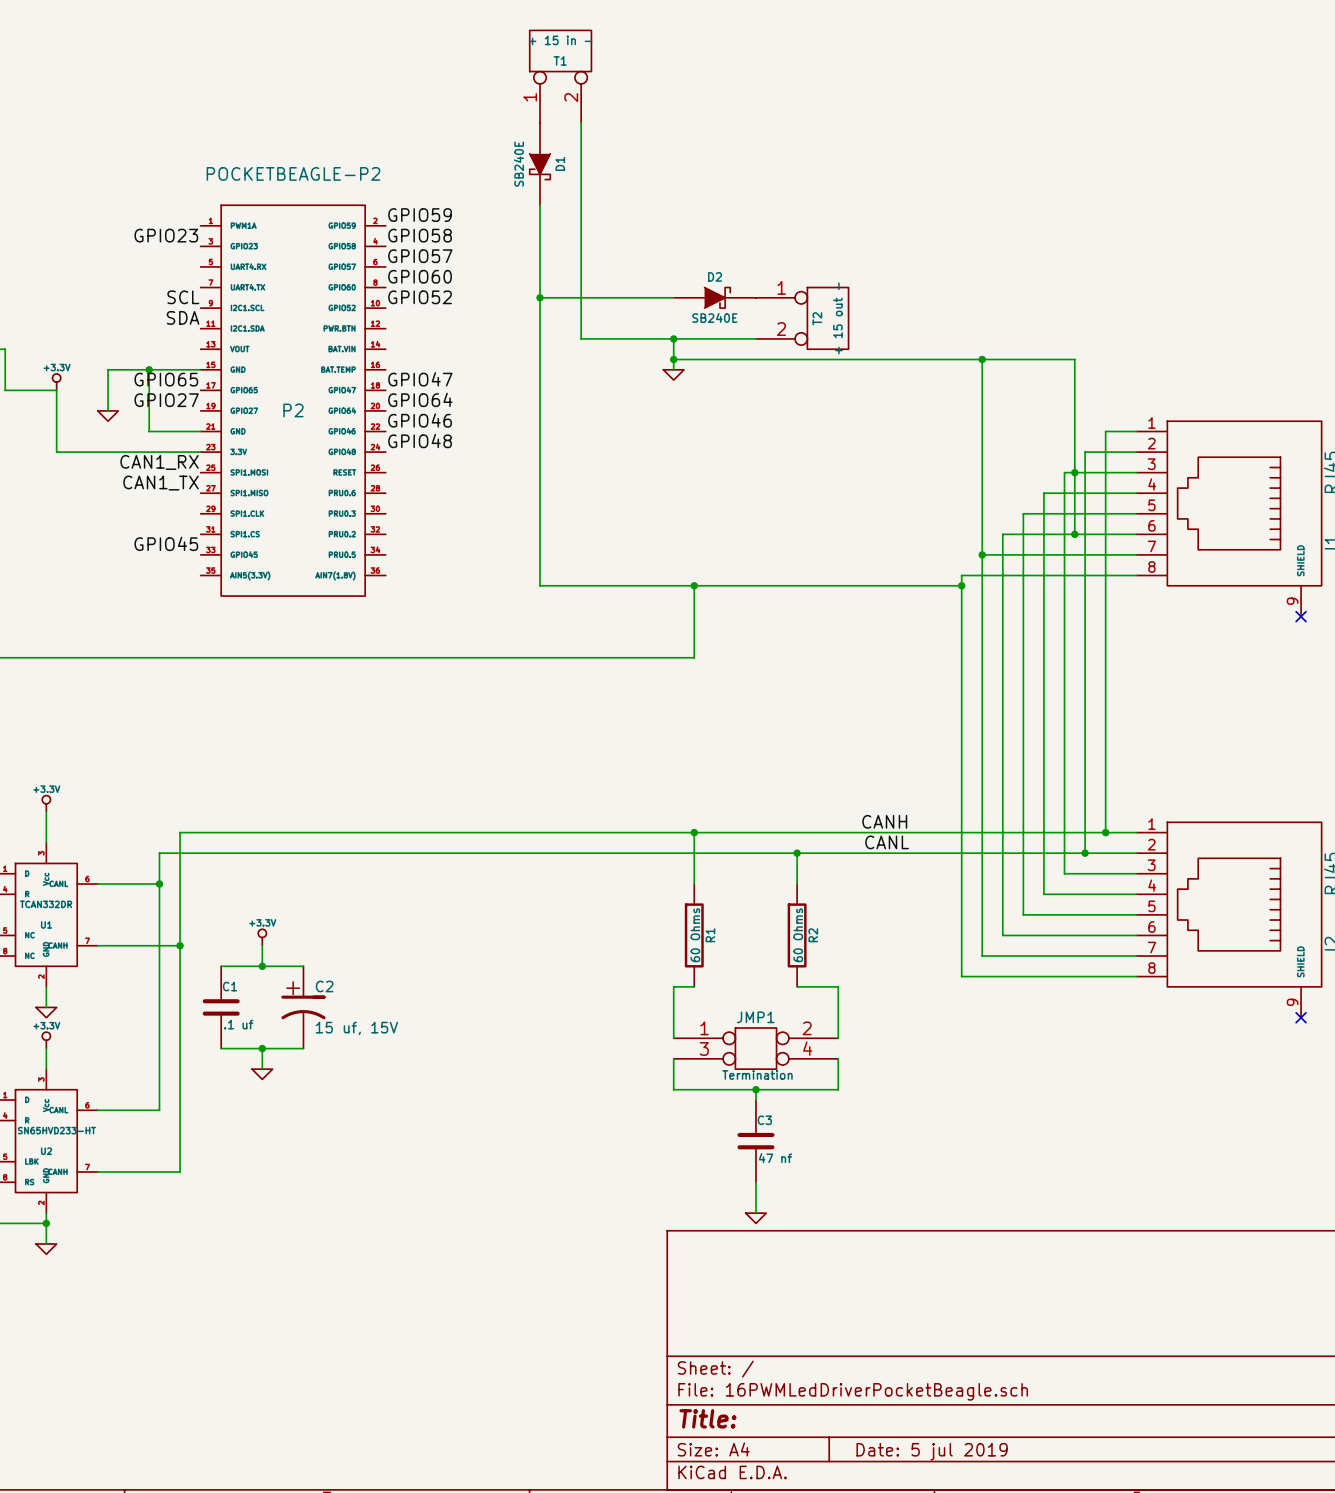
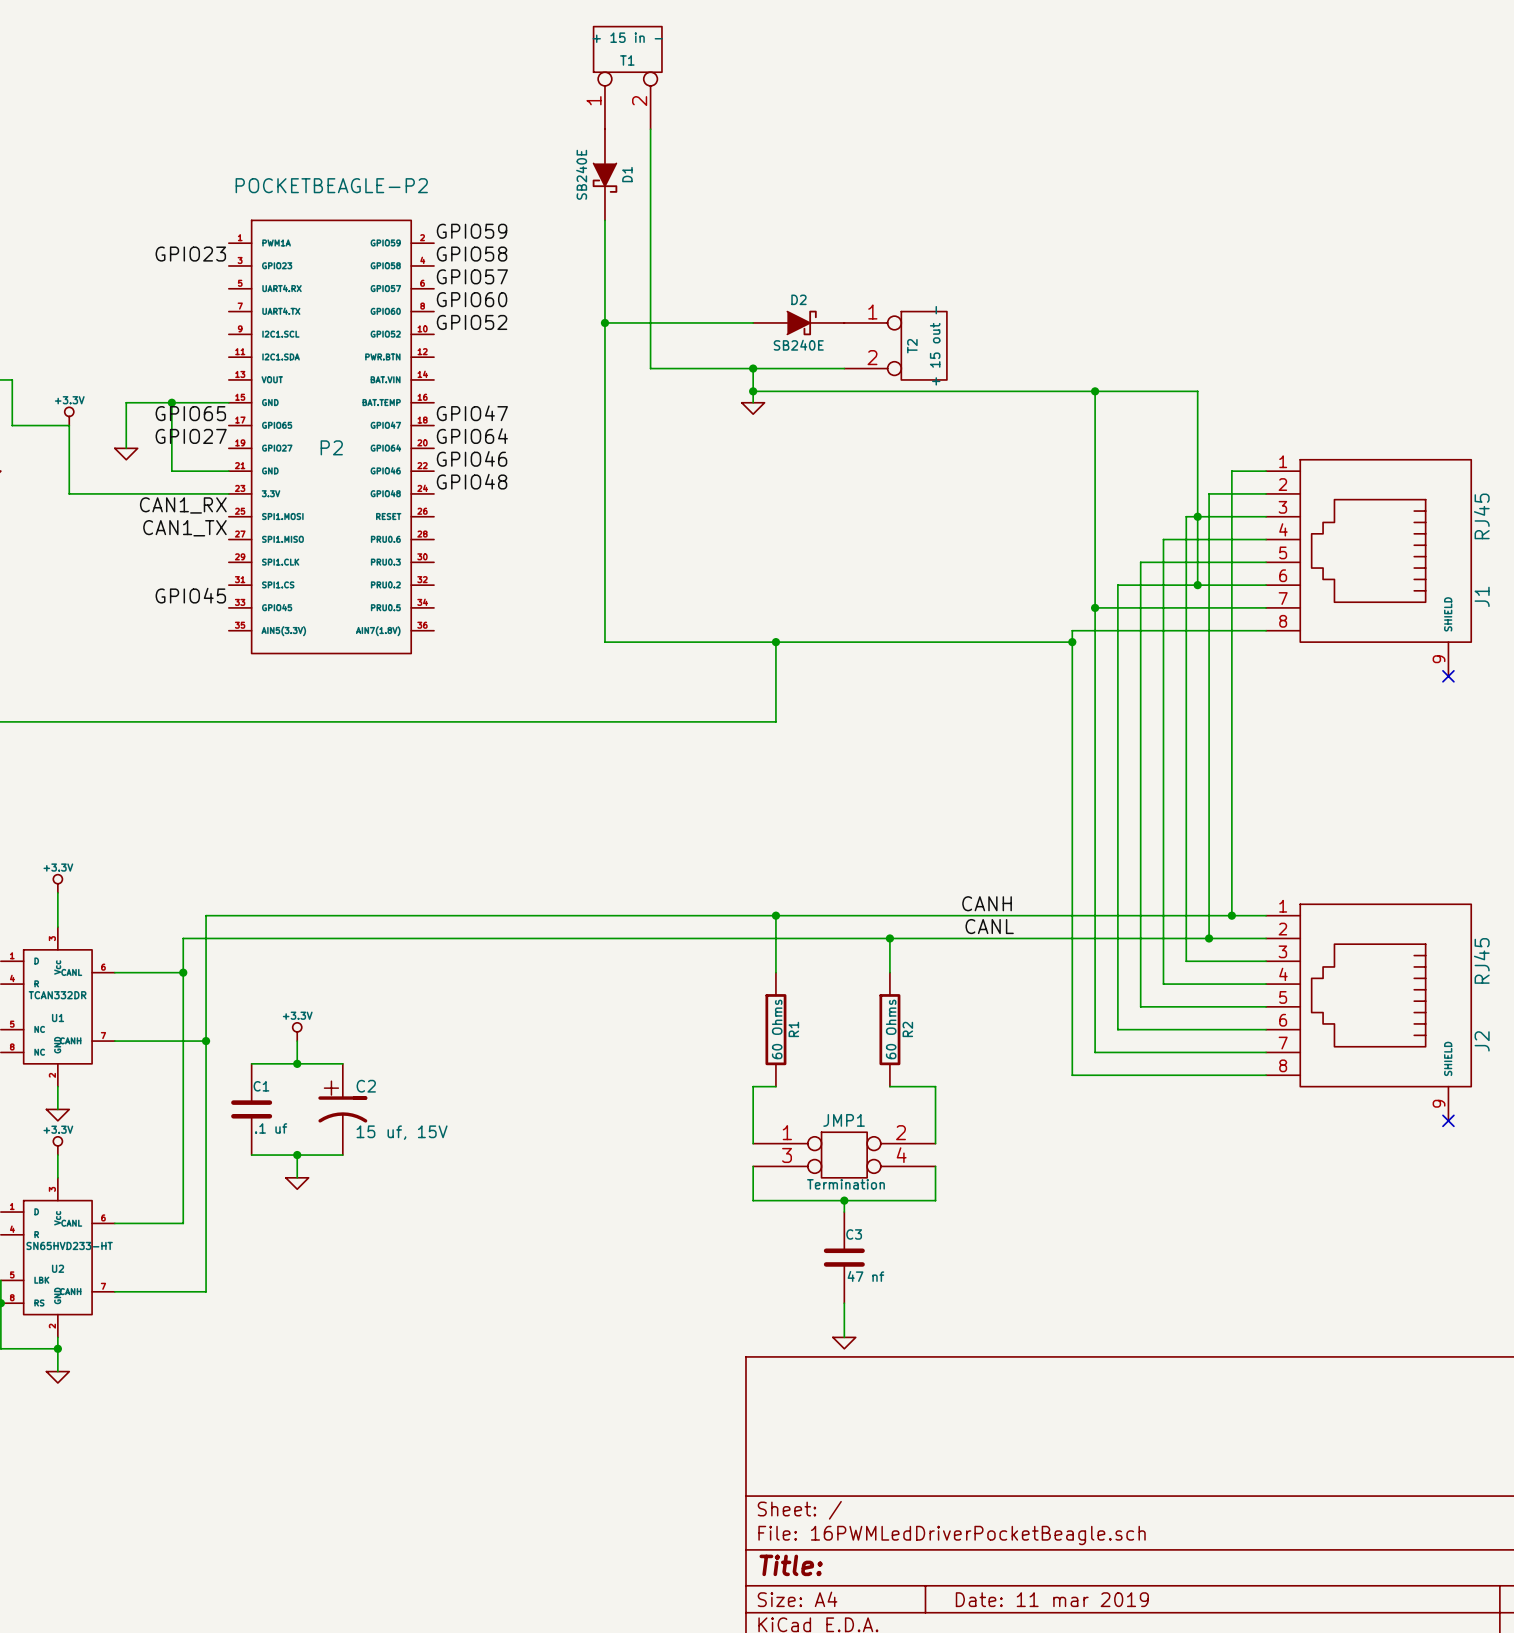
label: SCL (183, 297) -> none
label: SDA (183, 317) -> none
title block: Date: 5 jul 2019 (932, 1451) -> Date: 11 mar 2019 (1052, 1599)

